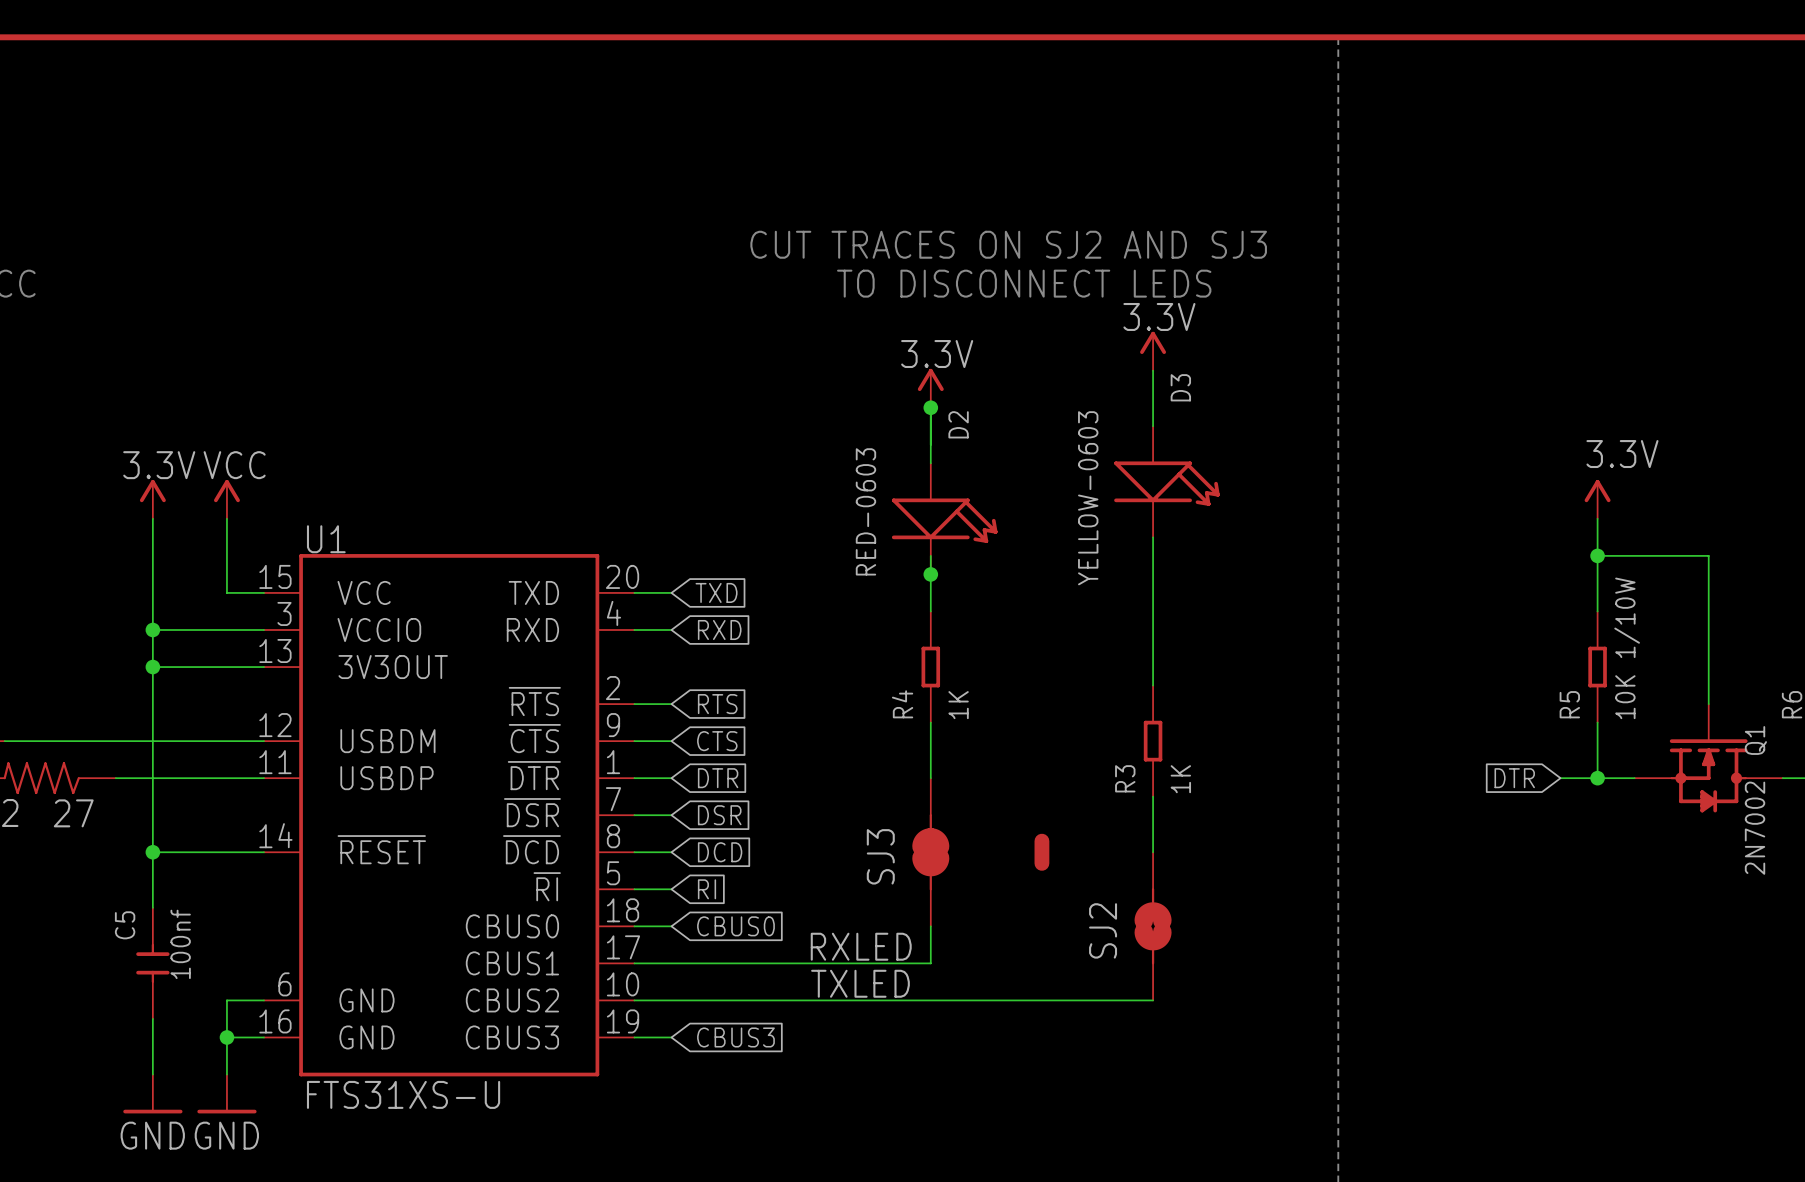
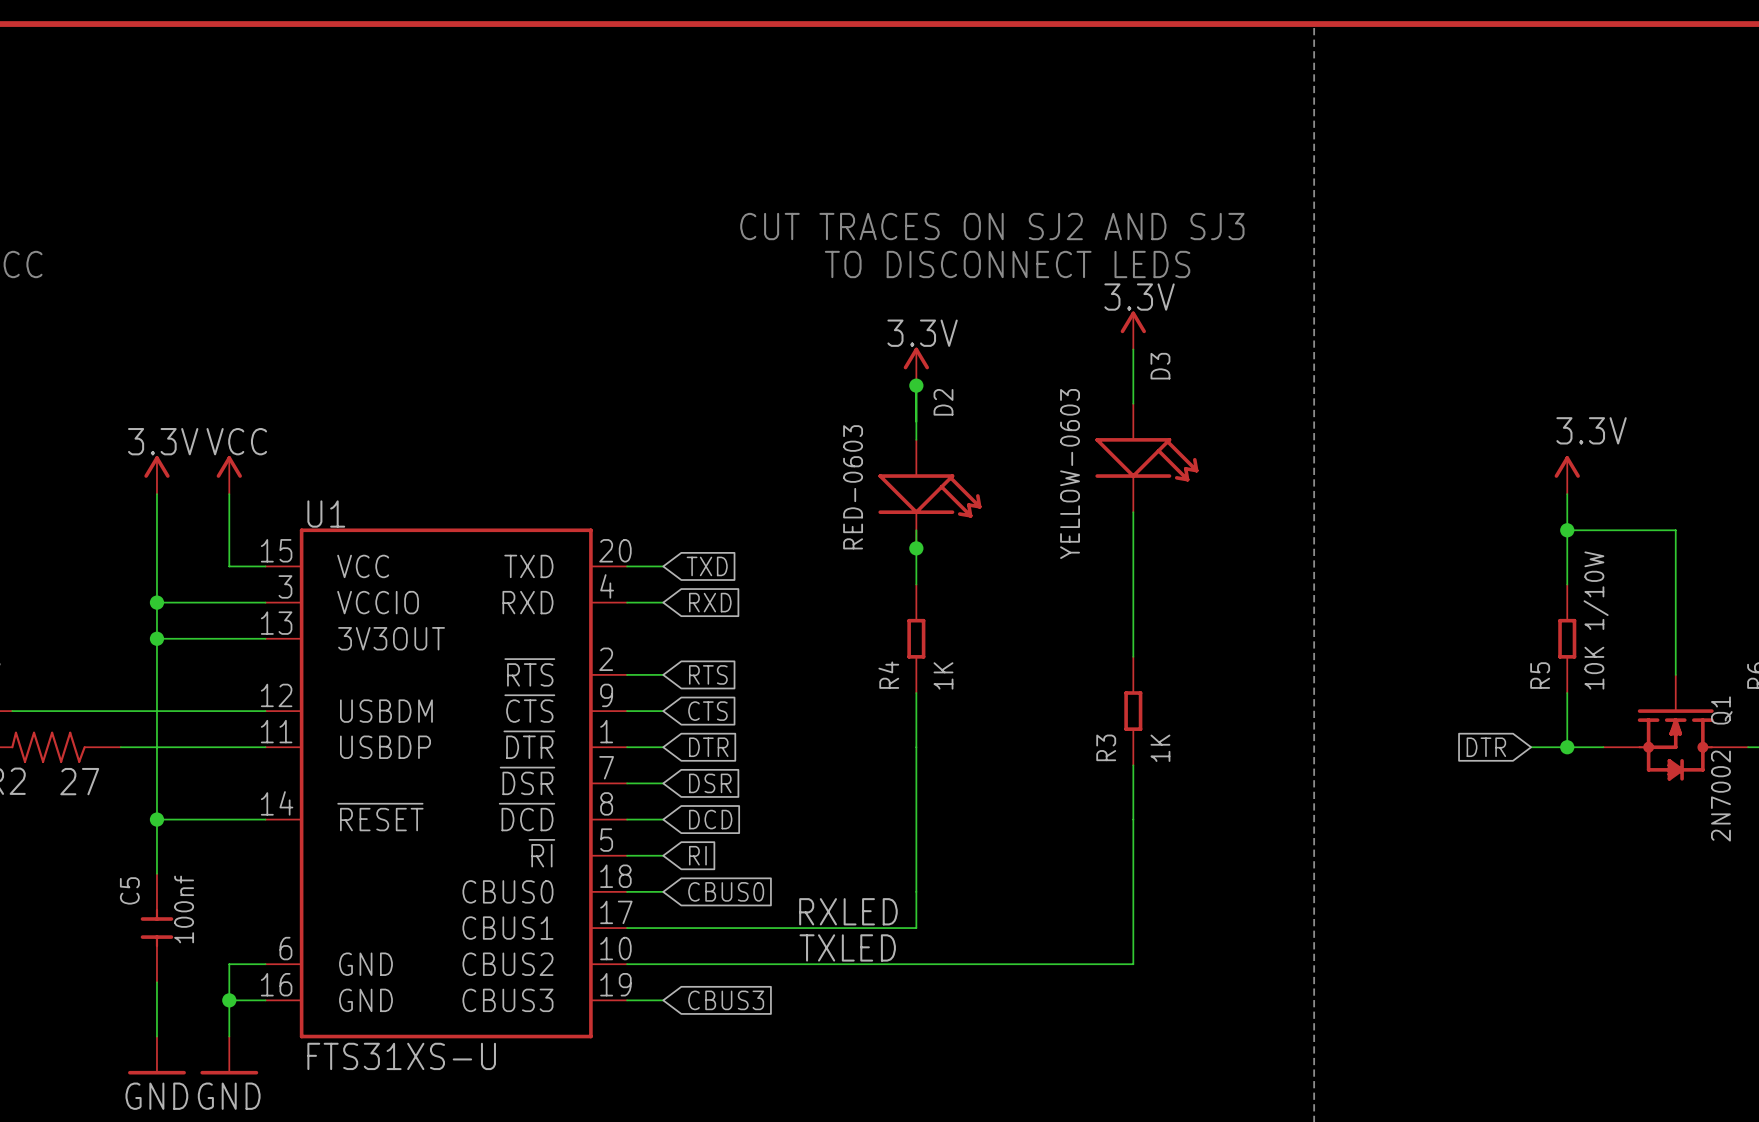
line: (1041, 841) (1041, 863) -> none
SJ3: (930, 852) -> none
SJ2: (1153, 926) -> none

